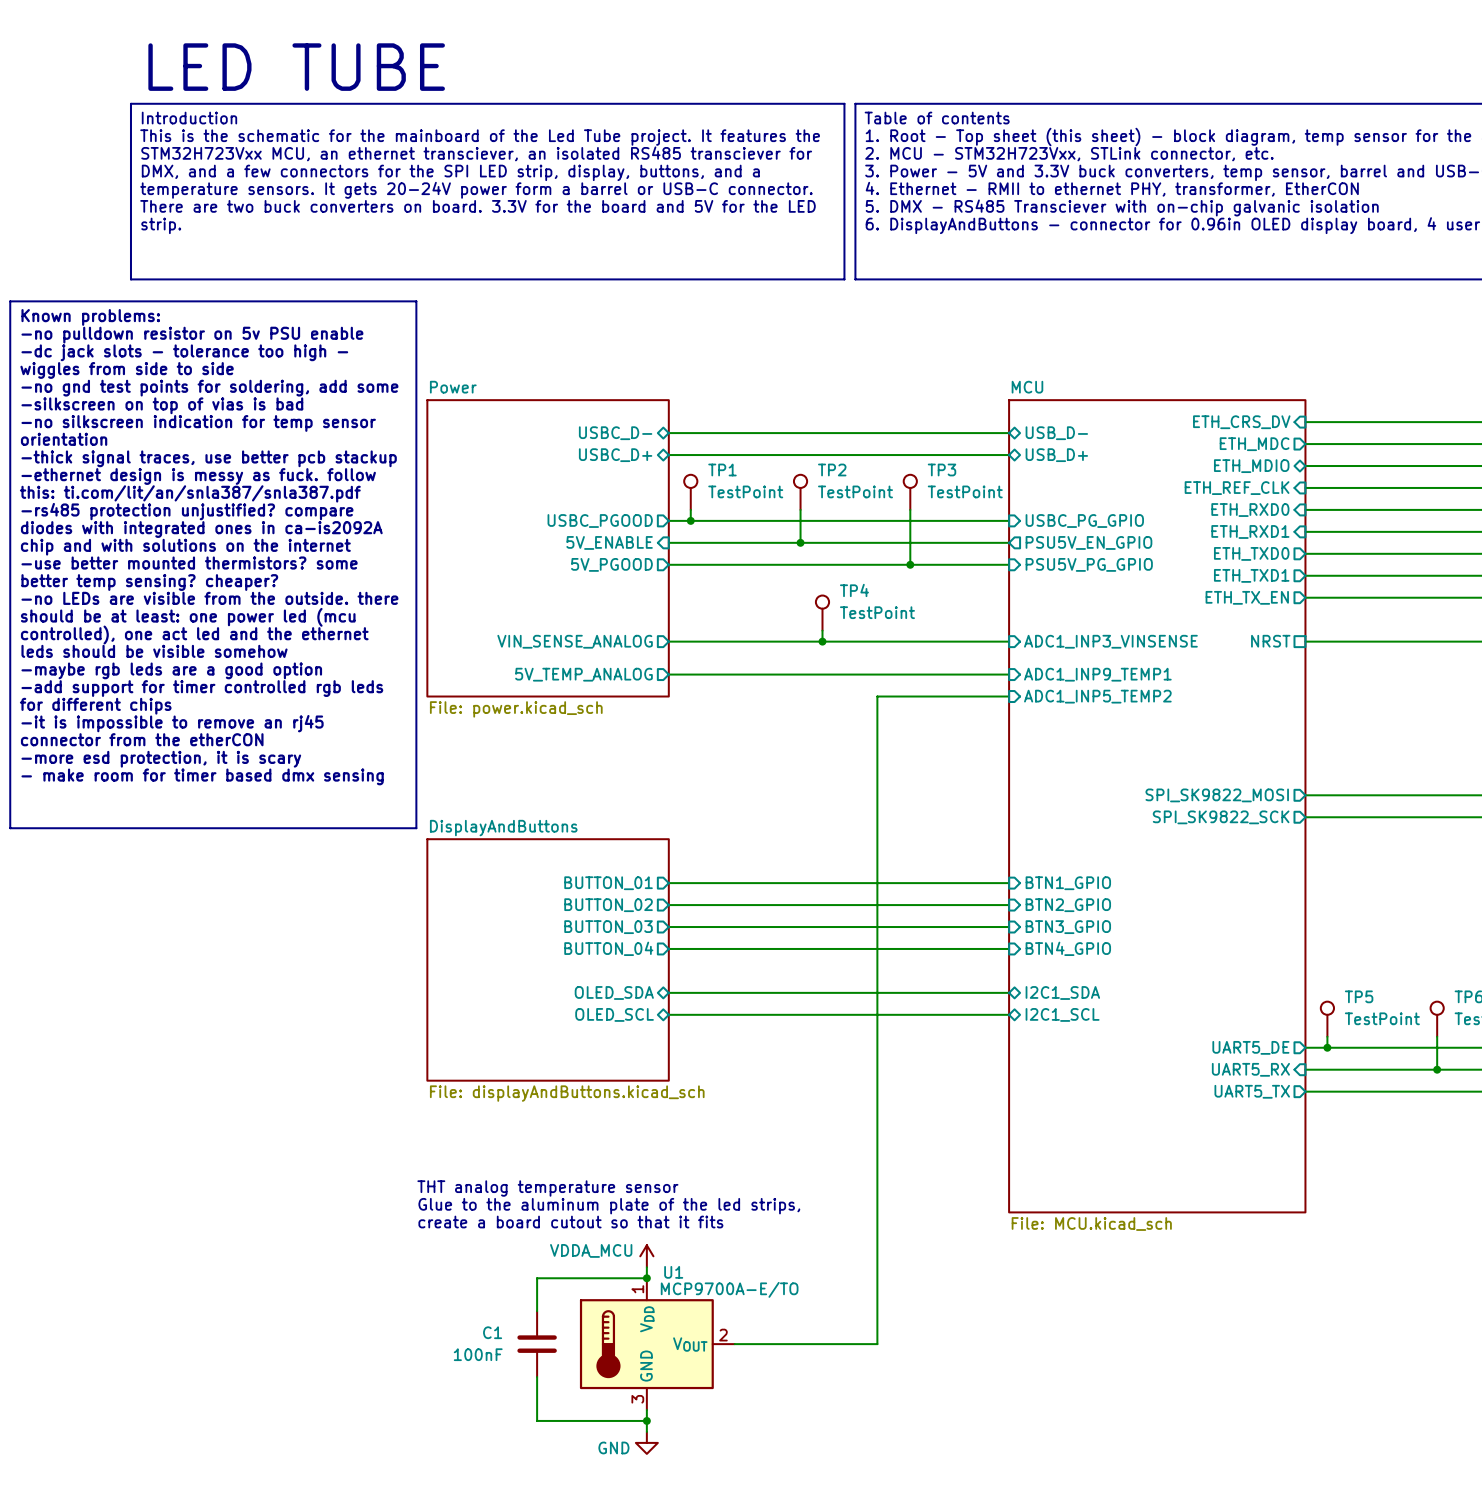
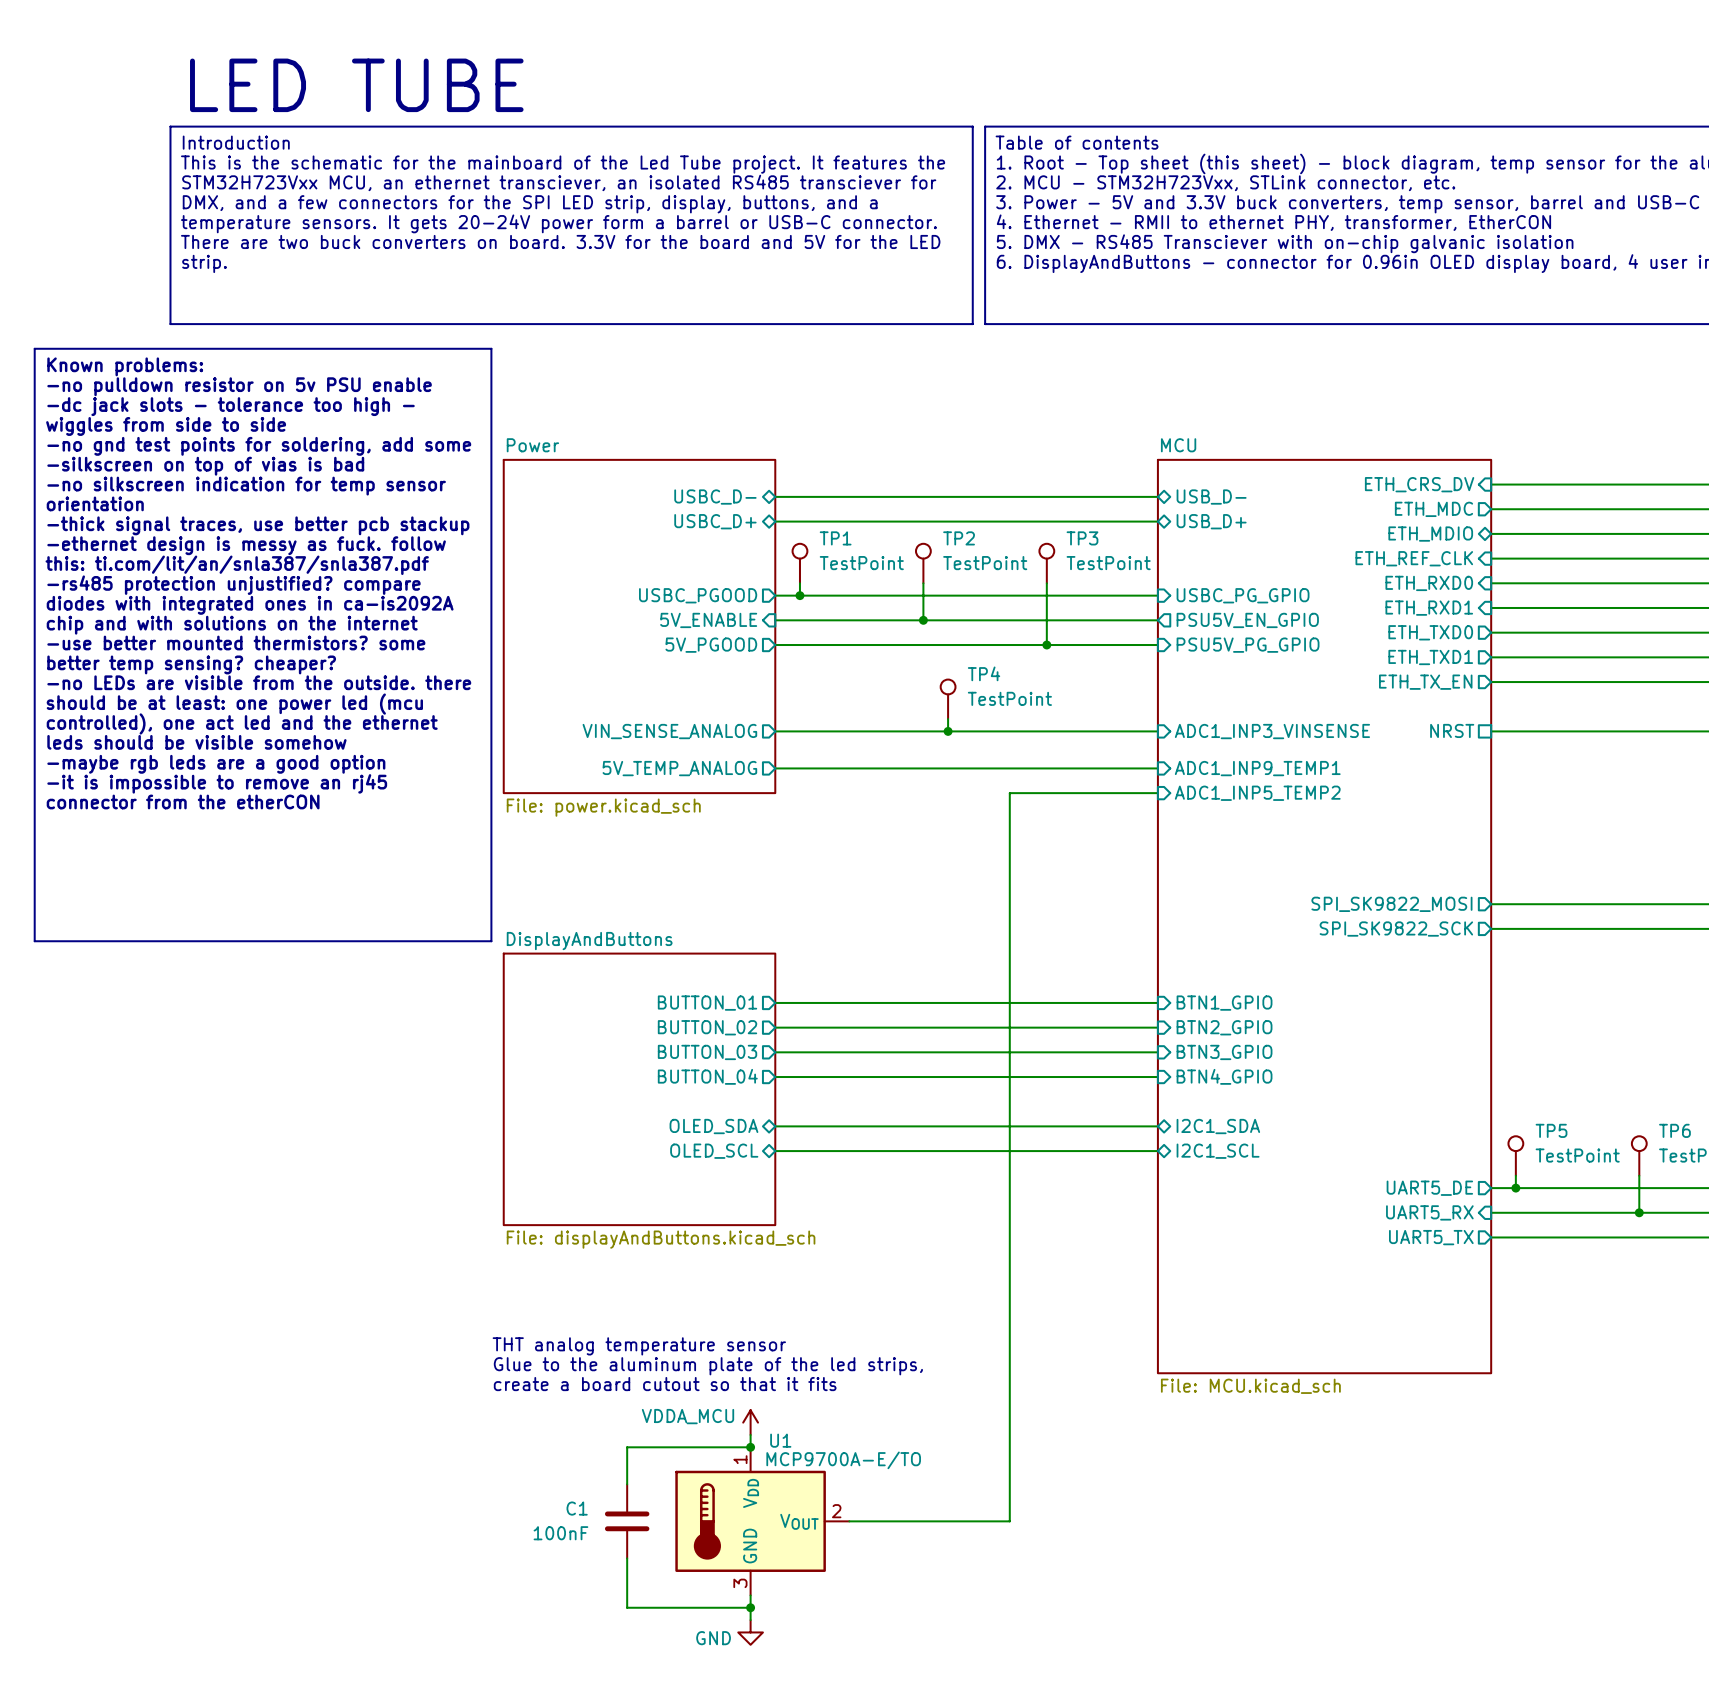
text: -add support for timer controlled rgb leds (202, 688) -> -it is impossible to remove an rj45 (217, 783)
text: for different chips (95, 706) -> connector from the etherCON (183, 801)
text: -it is impossible to remove an rj45 (172, 723) -> none
text: connector from the etherCON (142, 739) -> none
text: -more esd protection, it is scary (161, 759) -> none
text: - make room for timer based dmx sensing (202, 776) -> none

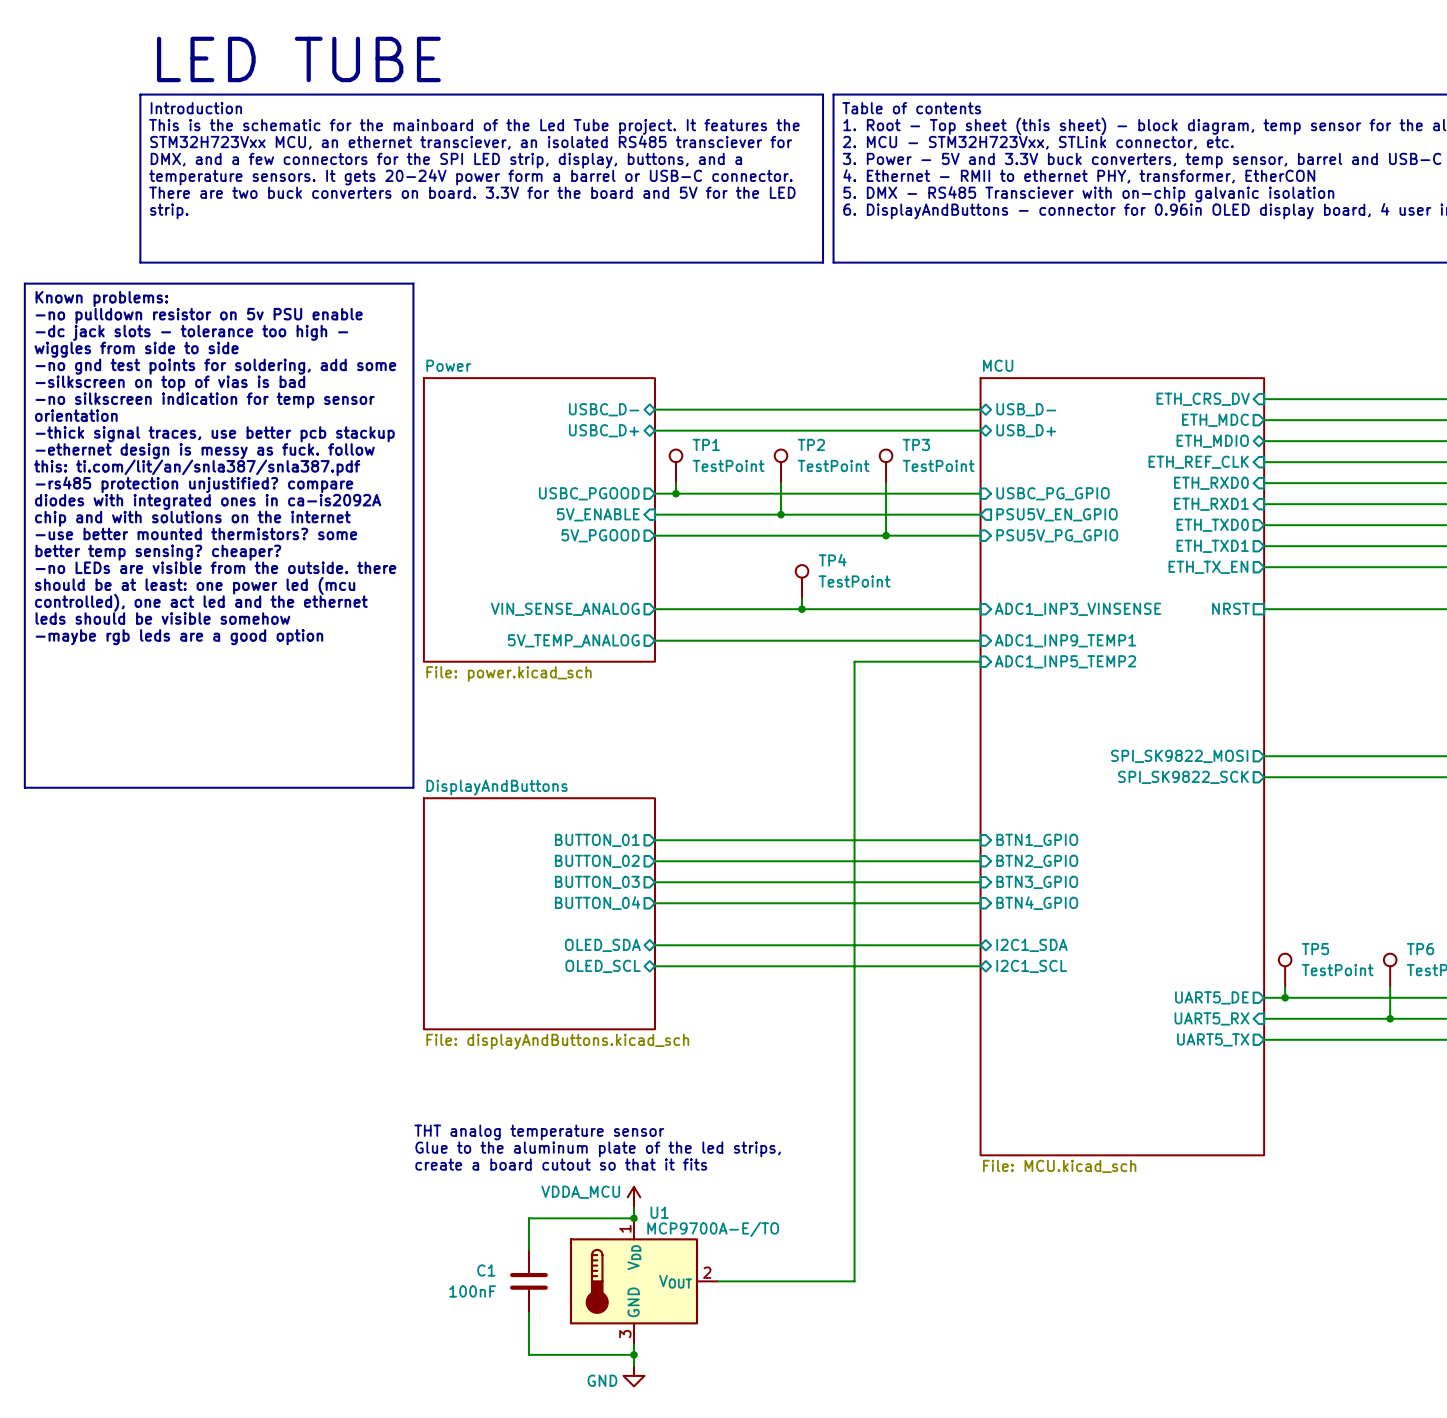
text: -it is impossible to remove an rj45 (217, 783) -> none
text: connector from the etherCON (183, 801) -> none

